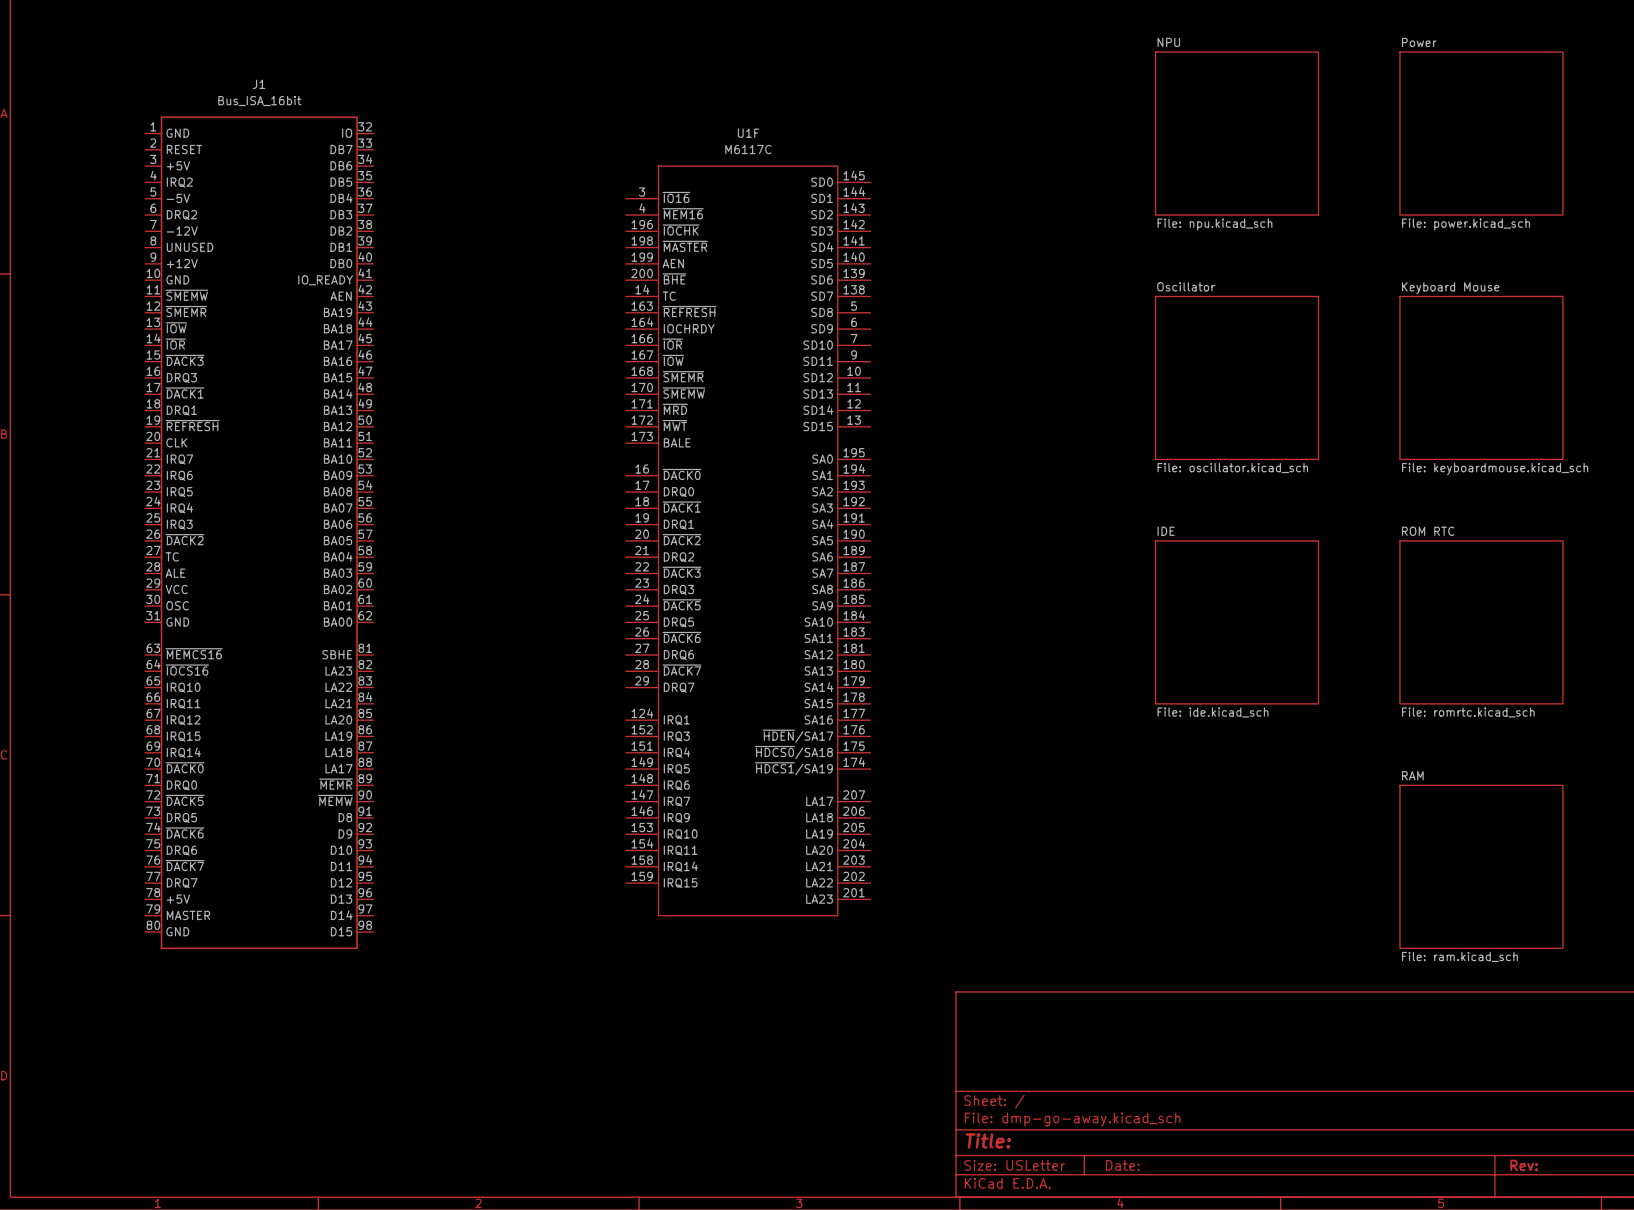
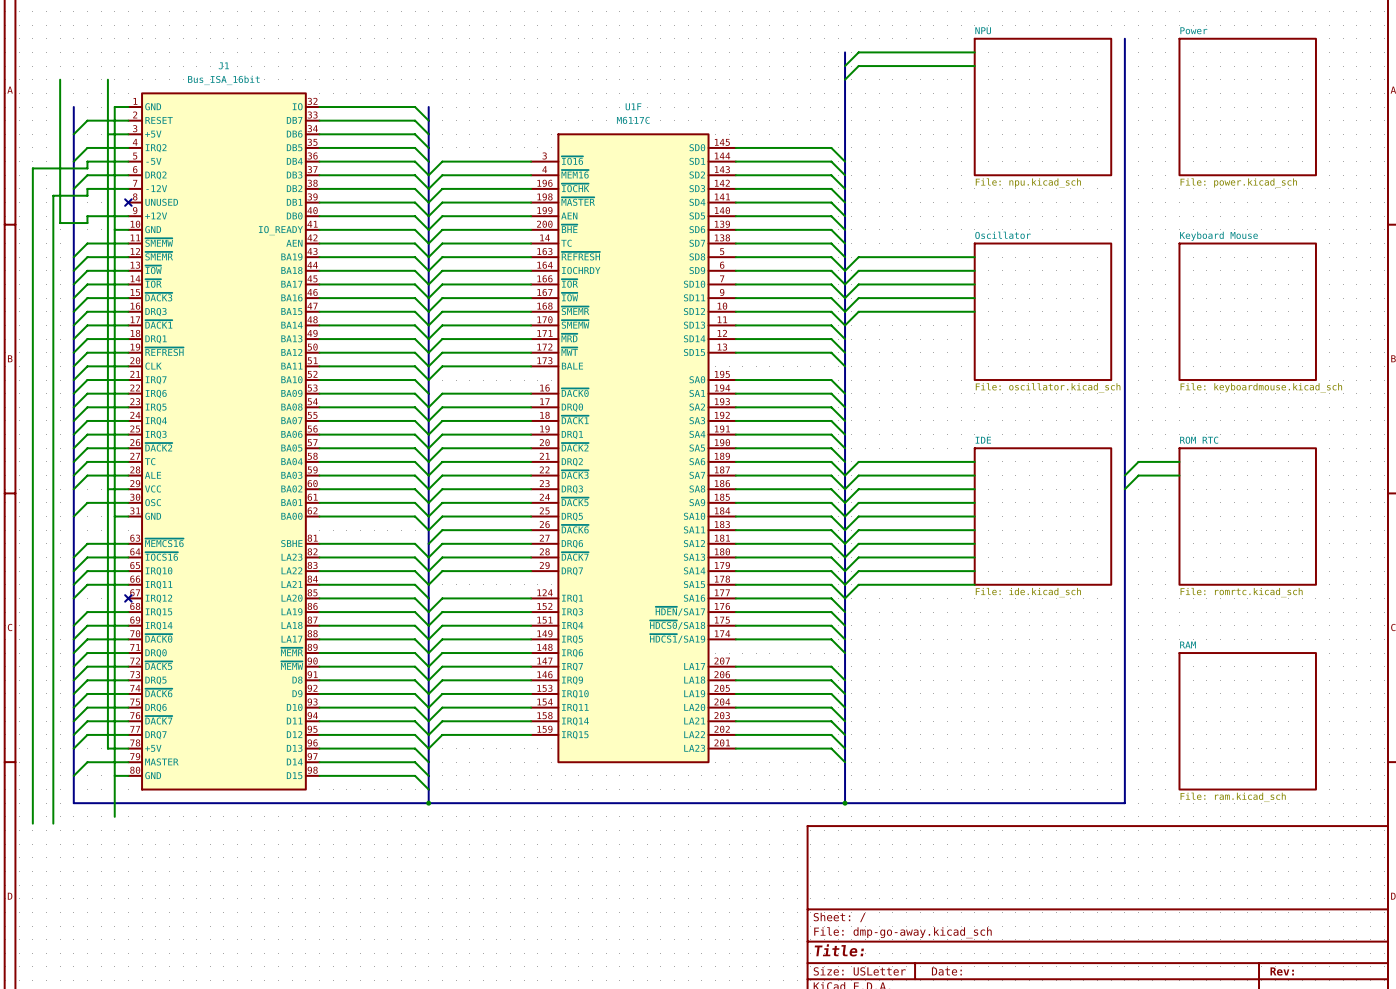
bus: none -> (1124, 38) (1124, 803) (73, 803) (73, 107)
bus: none -> (845, 52) (845, 803)
wire: none -> (974, 52) (858, 52) (845, 66)
wire: none -> (974, 66) (858, 66) (845, 79)
wire: none -> (60, 79) (60, 223) (87, 223) (87, 216) (128, 216)
wire: none -> (107, 79) (107, 748) (128, 748)
wire: none -> (128, 107) (114, 107) (114, 816)
wire: none -> (319, 107) (415, 107) (428, 120)
bus: none -> (428, 107) (428, 803)
wire: none -> (128, 120) (87, 120) (73, 134)
wire: none -> (319, 120) (415, 120) (428, 134)
wire: none -> (107, 134) (128, 134)
wire: none -> (319, 134) (415, 134) (428, 147)
wire: none -> (128, 147) (87, 147) (73, 161)
wire: none -> (319, 147) (415, 147) (428, 161)
wire: none -> (735, 147) (831, 147) (845, 161)
wire: none -> (128, 161) (87, 161) (87, 168) (32, 168) (32, 823)
wire: none -> (319, 161) (415, 161) (428, 175) (442, 161) (531, 161)
wire: none -> (735, 161) (831, 161) (845, 175)
wire: none -> (128, 175) (87, 175) (73, 188)
wire: none -> (319, 175) (415, 175) (428, 188) (442, 175) (531, 175)
wire: none -> (735, 175) (831, 175) (845, 188)
wire: none -> (128, 188) (87, 188) (87, 195) (53, 195) (53, 823)
wire: none -> (319, 188) (415, 188) (428, 202) (442, 188) (531, 188)
wire: none -> (735, 188) (831, 188) (845, 202)
no-connect mark: none -> (128, 202)
wire: none -> (319, 202) (415, 202) (428, 216) (442, 202) (531, 202)
wire: none -> (735, 202) (831, 202) (845, 216)
wire: none -> (319, 216) (415, 216) (428, 229) (442, 216) (531, 216)
wire: none -> (735, 216) (831, 216) (845, 229)
wire: none -> (114, 229) (128, 229)
wire: none -> (319, 229) (415, 229) (428, 243) (442, 229) (531, 229)
wire: none -> (735, 229) (831, 229) (845, 243)
wire: none -> (128, 243) (87, 243) (73, 257)
wire: none -> (319, 243) (415, 243) (428, 257) (442, 243) (531, 243)
wire: none -> (735, 243) (831, 243) (845, 257)
wire: none -> (128, 257) (87, 257) (73, 270)
wire: none -> (319, 257) (415, 257) (428, 270) (442, 257) (531, 257)
wire: none -> (735, 257) (831, 257) (845, 270) (858, 257) (974, 257)
wire: none -> (128, 270) (87, 270) (73, 284)
wire: none -> (319, 270) (415, 270) (428, 284) (442, 270) (531, 270)
wire: none -> (735, 270) (831, 270) (845, 284) (858, 270) (974, 270)
wire: none -> (128, 284) (87, 284) (73, 298)
wire: none -> (319, 284) (415, 284) (428, 298) (442, 284) (531, 284)
wire: none -> (735, 284) (831, 284) (845, 298) (858, 284) (974, 284)
wire: none -> (128, 298) (87, 298) (73, 311)
wire: none -> (319, 298) (415, 298) (428, 311) (442, 298) (531, 298)
wire: none -> (735, 298) (831, 298) (845, 311) (858, 298) (974, 298)
wire: none -> (128, 311) (87, 311) (73, 325)
wire: none -> (319, 311) (415, 311) (428, 325) (442, 311) (531, 311)
wire: none -> (735, 311) (831, 311) (845, 325) (858, 311) (974, 311)
wire: none -> (128, 325) (87, 325) (73, 339)
wire: none -> (319, 325) (415, 325) (428, 339) (442, 325) (531, 325)
wire: none -> (735, 325) (831, 325) (845, 339)
wire: none -> (128, 339) (87, 339) (73, 352)
wire: none -> (319, 339) (415, 339) (428, 352) (442, 339) (531, 339)
wire: none -> (735, 339) (831, 339) (845, 352)
wire: none -> (128, 352) (87, 352) (73, 366)
wire: none -> (319, 352) (415, 352) (428, 366) (442, 352) (531, 352)
wire: none -> (735, 352) (831, 352) (845, 366)
wire: none -> (128, 366) (87, 366) (73, 380)
wire: none -> (319, 366) (415, 366) (428, 380) (442, 366) (531, 366)
wire: none -> (128, 380) (87, 380) (73, 393)
wire: none -> (319, 380) (415, 380) (428, 393)
wire: none -> (735, 380) (831, 380) (845, 393)
wire: none -> (128, 393) (87, 393) (73, 407)
wire: none -> (319, 393) (415, 393) (428, 407) (442, 393) (531, 393)
wire: none -> (735, 393) (831, 393) (845, 407)
wire: none -> (128, 407) (87, 407) (73, 420)
wire: none -> (319, 407) (415, 407) (428, 420) (442, 407) (531, 407)
wire: none -> (735, 407) (831, 407) (845, 420)
wire: none -> (128, 420) (87, 420) (73, 434)
wire: none -> (319, 420) (415, 420) (428, 434) (442, 420) (531, 420)
wire: none -> (735, 420) (831, 420) (845, 434)
wire: none -> (128, 434) (87, 434) (73, 448)
wire: none -> (319, 434) (415, 434) (428, 448) (442, 434) (531, 434)
wire: none -> (735, 434) (831, 434) (845, 448)
wire: none -> (128, 448) (87, 448) (73, 461)
wire: none -> (319, 448) (415, 448) (428, 461) (442, 448) (531, 448)
wire: none -> (735, 448) (831, 448) (845, 461)
wire: none -> (128, 461) (87, 461) (73, 475)
wire: none -> (319, 461) (415, 461) (428, 475) (442, 461) (531, 461)
wire: none -> (735, 461) (831, 461) (845, 475) (858, 461) (974, 461)
wire: none -> (1179, 461) (1138, 461) (1124, 475)
wire: none -> (128, 475) (87, 475) (73, 489)
wire: none -> (319, 475) (415, 475) (428, 489) (442, 475) (531, 475)
wire: none -> (735, 475) (831, 475) (845, 489) (858, 475) (974, 475)
wire: none -> (1179, 475) (1138, 475) (1124, 489)
wire: none -> (107, 489) (128, 489)
wire: none -> (319, 489) (415, 489) (428, 502) (442, 489) (531, 489)
wire: none -> (735, 489) (831, 489) (845, 502) (858, 489) (974, 489)
wire: none -> (128, 502) (87, 502) (73, 516)
wire: none -> (319, 502) (415, 502) (428, 516) (442, 502) (531, 502)
wire: none -> (735, 502) (831, 502) (845, 516) (858, 502) (974, 502)
wire: none -> (114, 516) (128, 516)
wire: none -> (319, 516) (415, 516) (428, 530) (442, 516) (531, 516)
wire: none -> (735, 516) (831, 516) (845, 530) (858, 516) (974, 516)
wire: none -> (531, 530) (442, 530) (428, 543)
wire: none -> (735, 530) (831, 530) (845, 543) (858, 530) (974, 530)
wire: none -> (128, 543) (87, 543) (73, 557)
wire: none -> (319, 543) (415, 543) (428, 557) (442, 543) (531, 543)
wire: none -> (735, 543) (831, 543) (845, 557) (858, 543) (974, 543)
wire: none -> (128, 557) (87, 557) (73, 571)
wire: none -> (319, 557) (415, 557) (428, 571) (442, 557) (531, 557)
wire: none -> (735, 557) (831, 557) (845, 571) (858, 557) (974, 557)
wire: none -> (128, 571) (87, 571) (73, 584)
wire: none -> (319, 571) (415, 571) (428, 584) (442, 571) (531, 571)
wire: none -> (735, 571) (831, 571) (845, 584) (858, 571) (974, 571)
wire: none -> (128, 584) (87, 584) (73, 598)
wire: none -> (319, 584) (415, 584) (428, 598)
wire: none -> (735, 584) (831, 584) (845, 598) (858, 584) (974, 584)
no-connect mark: none -> (128, 598)
wire: none -> (319, 598) (415, 598) (428, 612) (442, 598) (531, 598)
wire: none -> (735, 598) (831, 598) (845, 612)
wire: none -> (128, 612) (87, 612) (73, 625)
wire: none -> (319, 612) (415, 612) (428, 625) (442, 612) (531, 612)
wire: none -> (735, 612) (831, 612) (845, 625)
wire: none -> (128, 625) (87, 625) (73, 639)
wire: none -> (319, 625) (415, 625) (428, 639) (442, 625) (531, 625)
wire: none -> (735, 625) (831, 625) (845, 639)
wire: none -> (128, 639) (87, 639) (73, 653)
wire: none -> (319, 639) (415, 639) (428, 653) (442, 639) (531, 639)
wire: none -> (735, 639) (831, 639) (845, 653)
wire: none -> (128, 653) (87, 653) (73, 666)
wire: none -> (319, 653) (415, 653) (428, 666) (442, 653) (531, 653)
wire: none -> (128, 666) (87, 666) (73, 680)
wire: none -> (319, 666) (415, 666) (428, 680) (442, 666) (531, 666)
wire: none -> (735, 666) (831, 666) (845, 680)
wire: none -> (128, 680) (87, 680) (73, 693)
wire: none -> (319, 680) (415, 680) (428, 693) (442, 680) (531, 680)
wire: none -> (735, 680) (831, 680) (845, 693)
wire: none -> (128, 693) (87, 693) (73, 707)
wire: none -> (319, 693) (415, 693) (428, 707) (442, 693) (531, 693)
wire: none -> (735, 693) (831, 693) (845, 707)
wire: none -> (128, 707) (87, 707) (73, 721)
wire: none -> (319, 707) (415, 707) (428, 721) (442, 707) (531, 707)
wire: none -> (735, 707) (831, 707) (845, 721)
wire: none -> (128, 721) (87, 721) (73, 734)
wire: none -> (319, 721) (415, 721) (428, 734) (442, 721) (531, 721)
wire: none -> (735, 721) (831, 721) (845, 734)
wire: none -> (128, 734) (87, 734) (73, 748)
wire: none -> (319, 734) (415, 734) (428, 748) (442, 734) (531, 734)
wire: none -> (735, 734) (831, 734) (845, 748)
wire: none -> (319, 748) (415, 748) (428, 762)
wire: none -> (735, 748) (831, 748) (845, 762)
wire: none -> (128, 762) (87, 762) (73, 775)
wire: none -> (319, 762) (415, 762) (428, 775)
wire: none -> (114, 775) (128, 775)
wire: none -> (319, 775) (415, 775) (428, 789)
junction: none -> (428, 803)
junction: none -> (845, 803)

